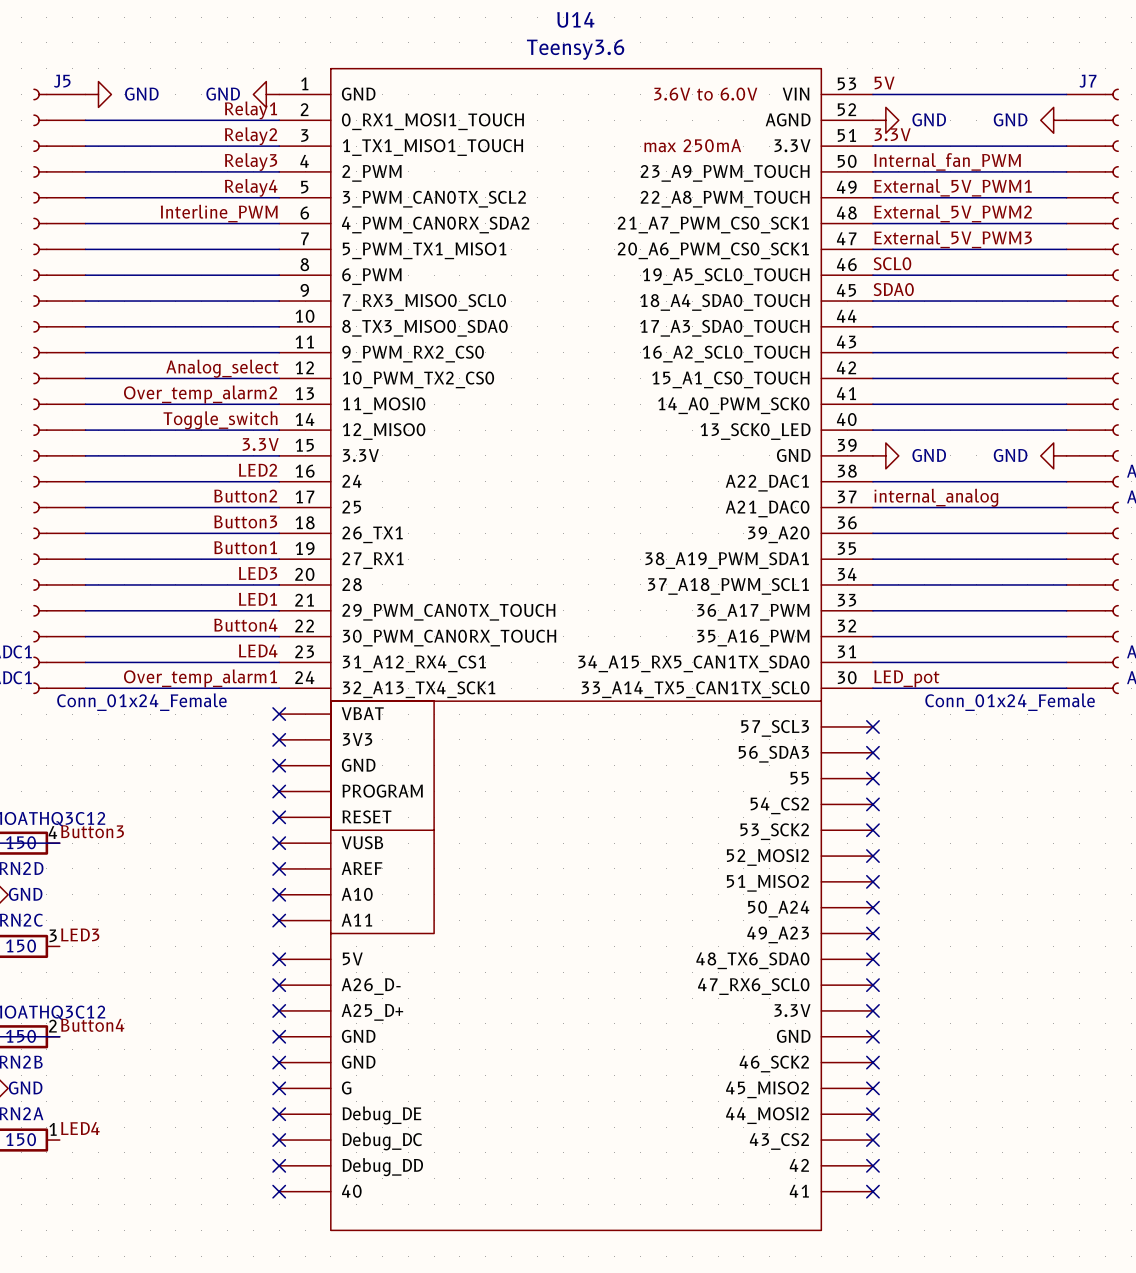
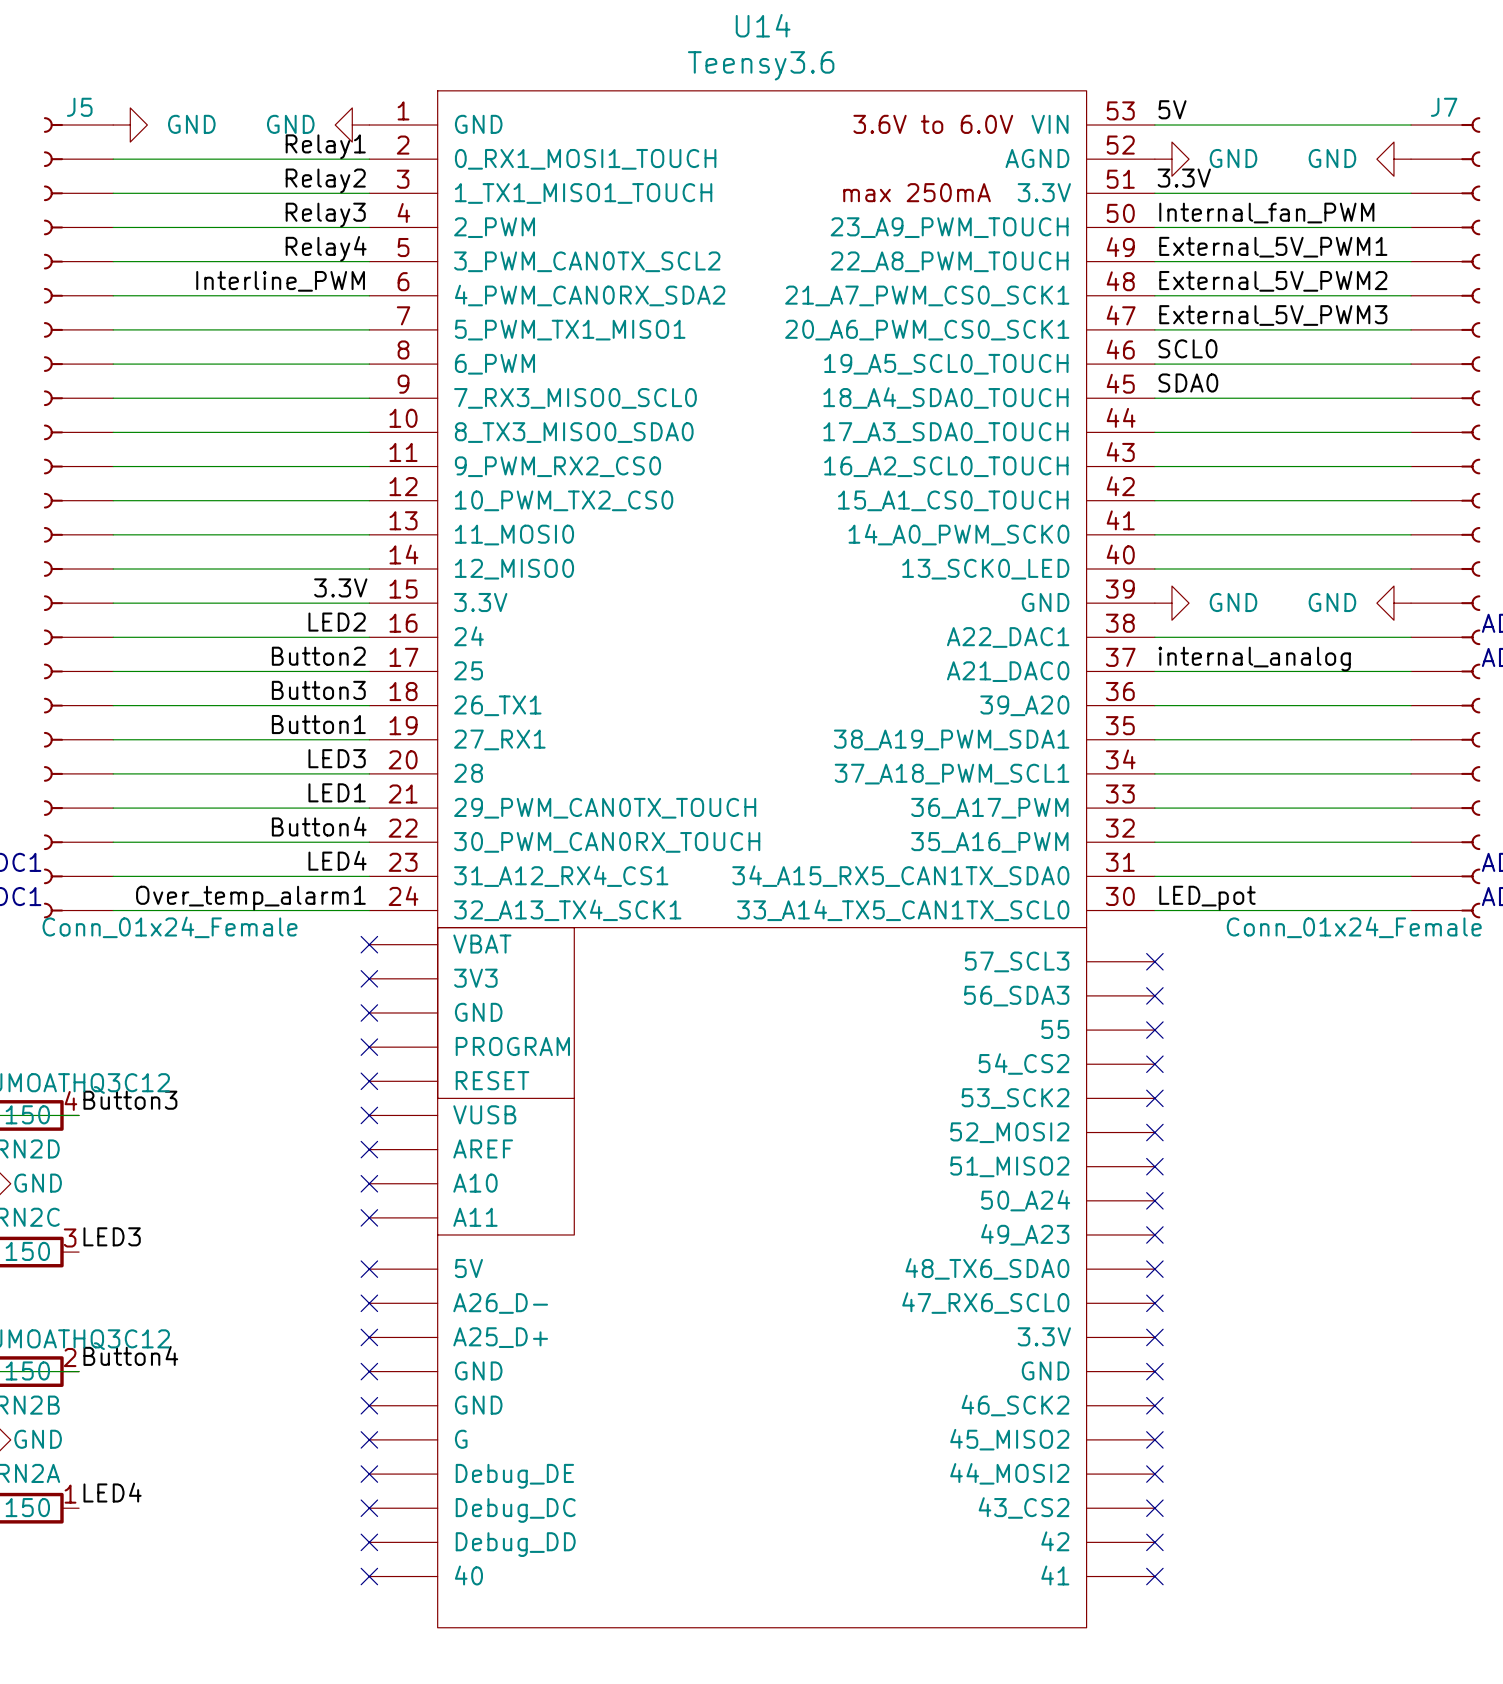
label: Analog_select (222, 368) -> none
label: Over_temp_alarm2 (200, 394) -> none
label: Toggle_switch (220, 420) -> none

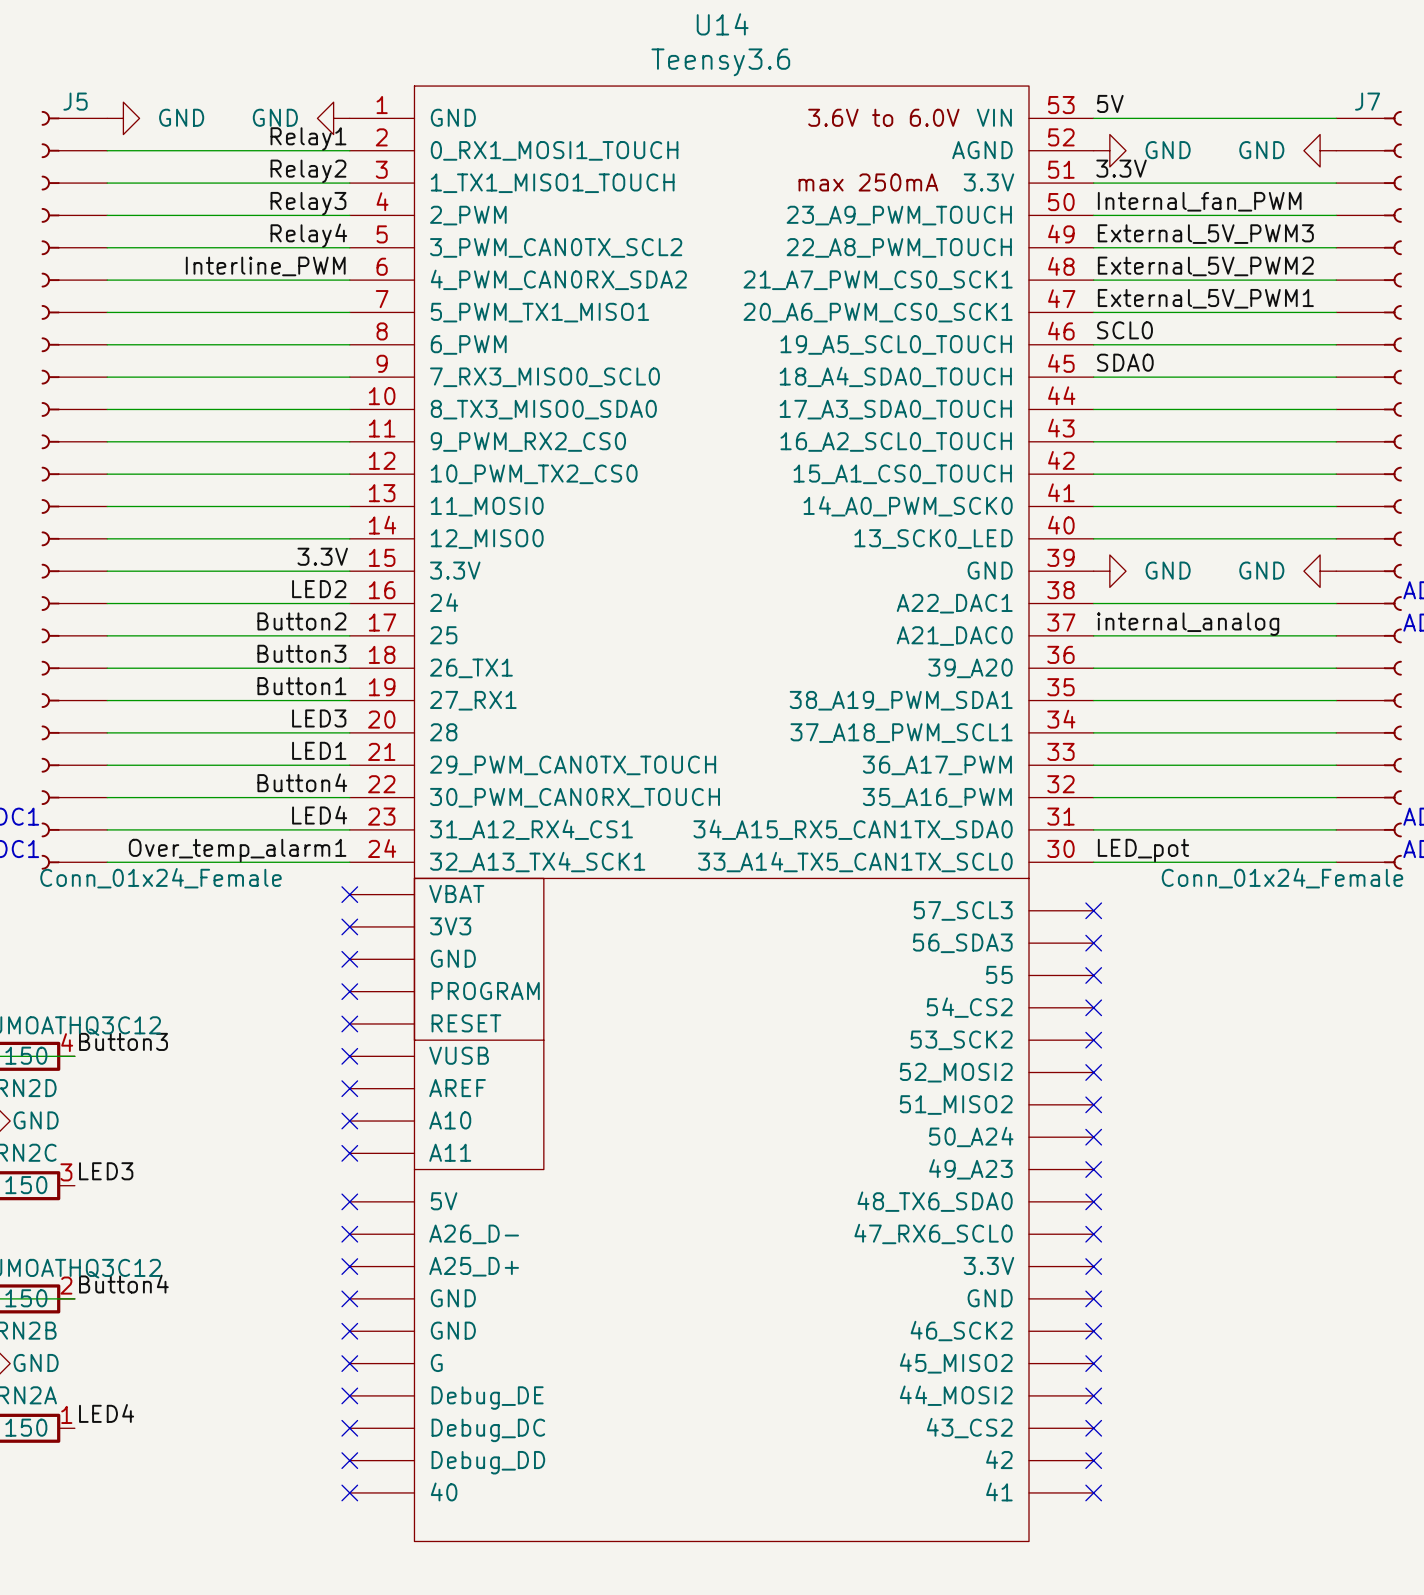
label: External_5V_PWM1 (1273, 247) -> External_5V_PWM3 (1205, 234)
label: External_5V_PWM3 (1273, 315) -> External_5V_PWM1 (1205, 298)

